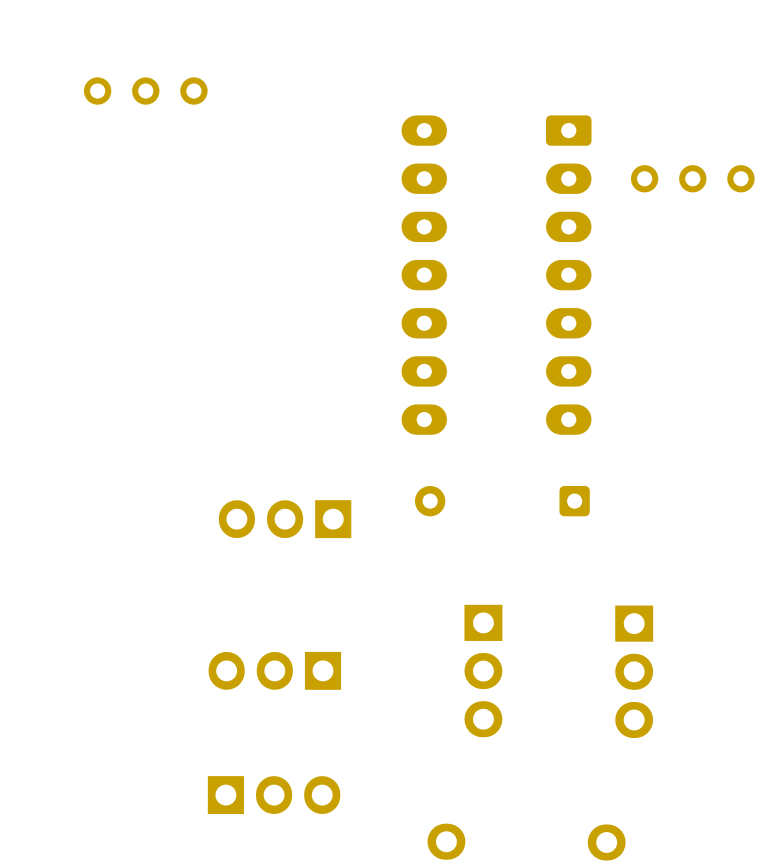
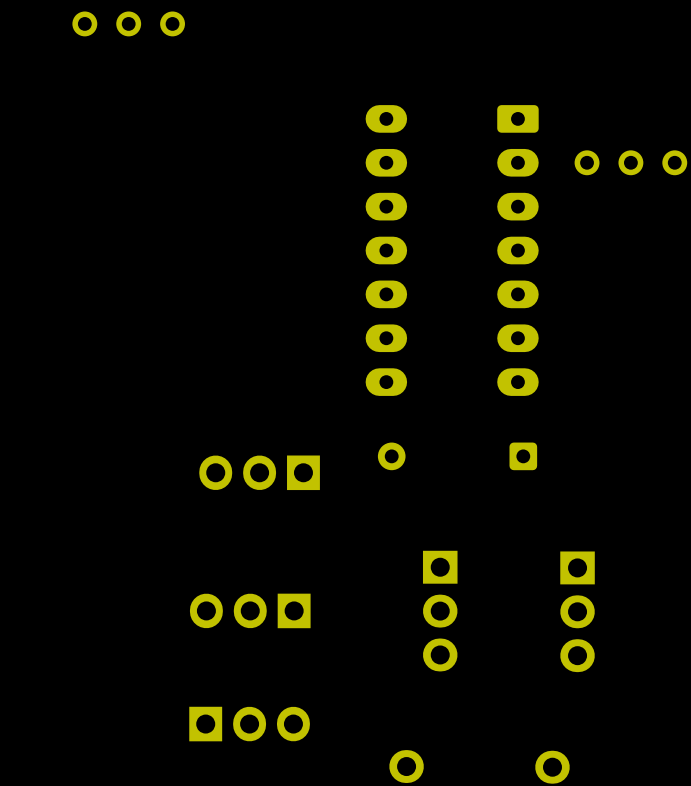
part position: (145, 91) -> (128, 23)

